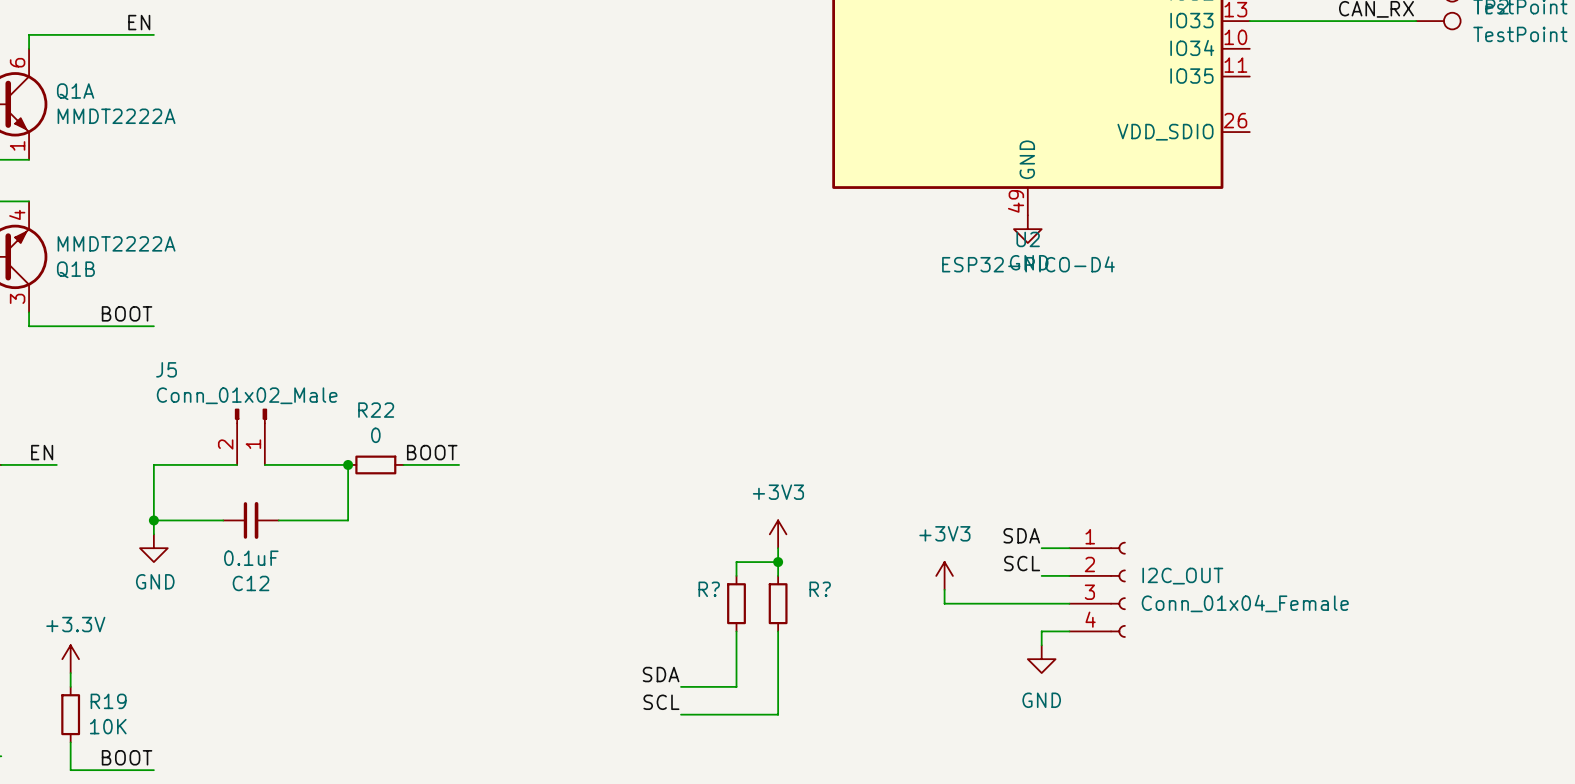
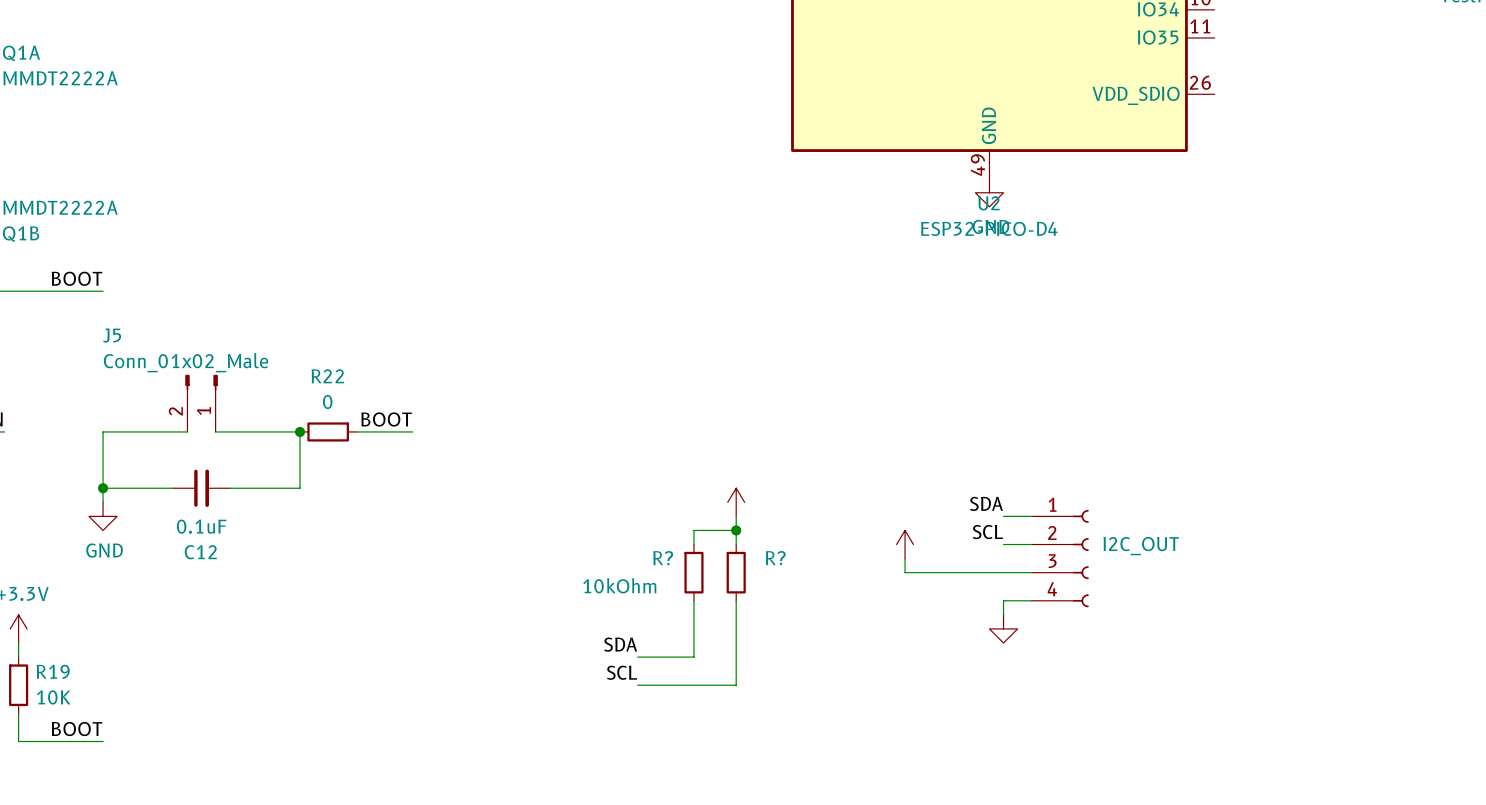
power symbol text: +3V3 (778, 492) -> none
power symbol text: +3V3 (944, 533) -> none
I2C_OUT value: Conn_01x04_Female (1245, 603) -> none
R? value: none -> 10kOhm (619, 585)
power symbol text: GND (1041, 700) -> none

